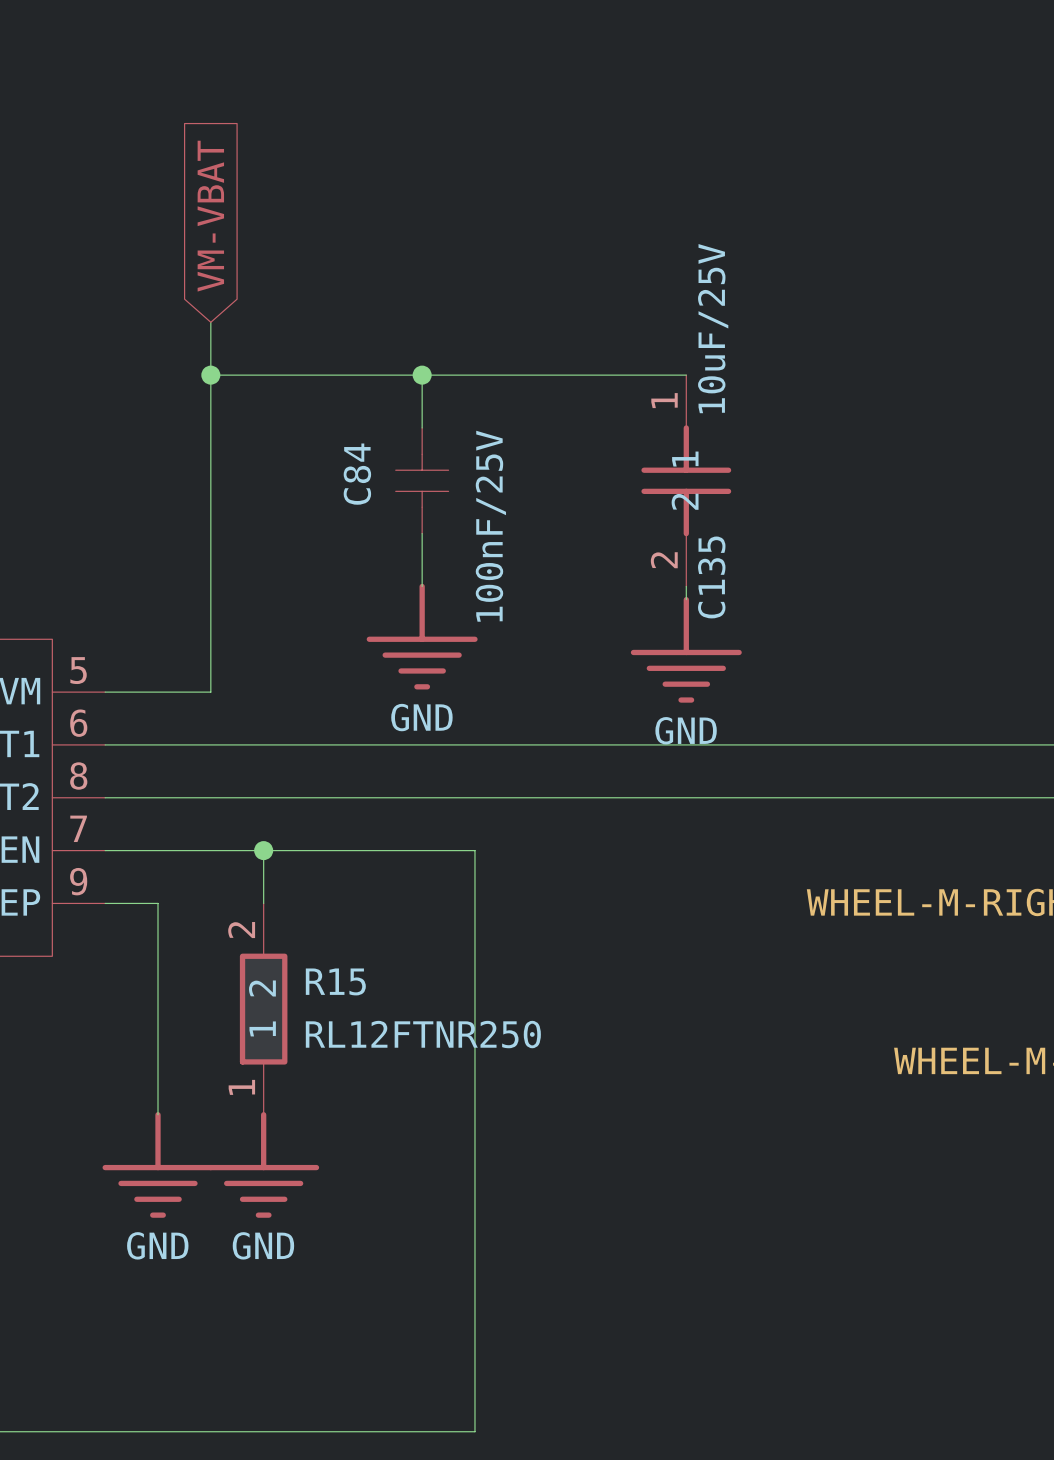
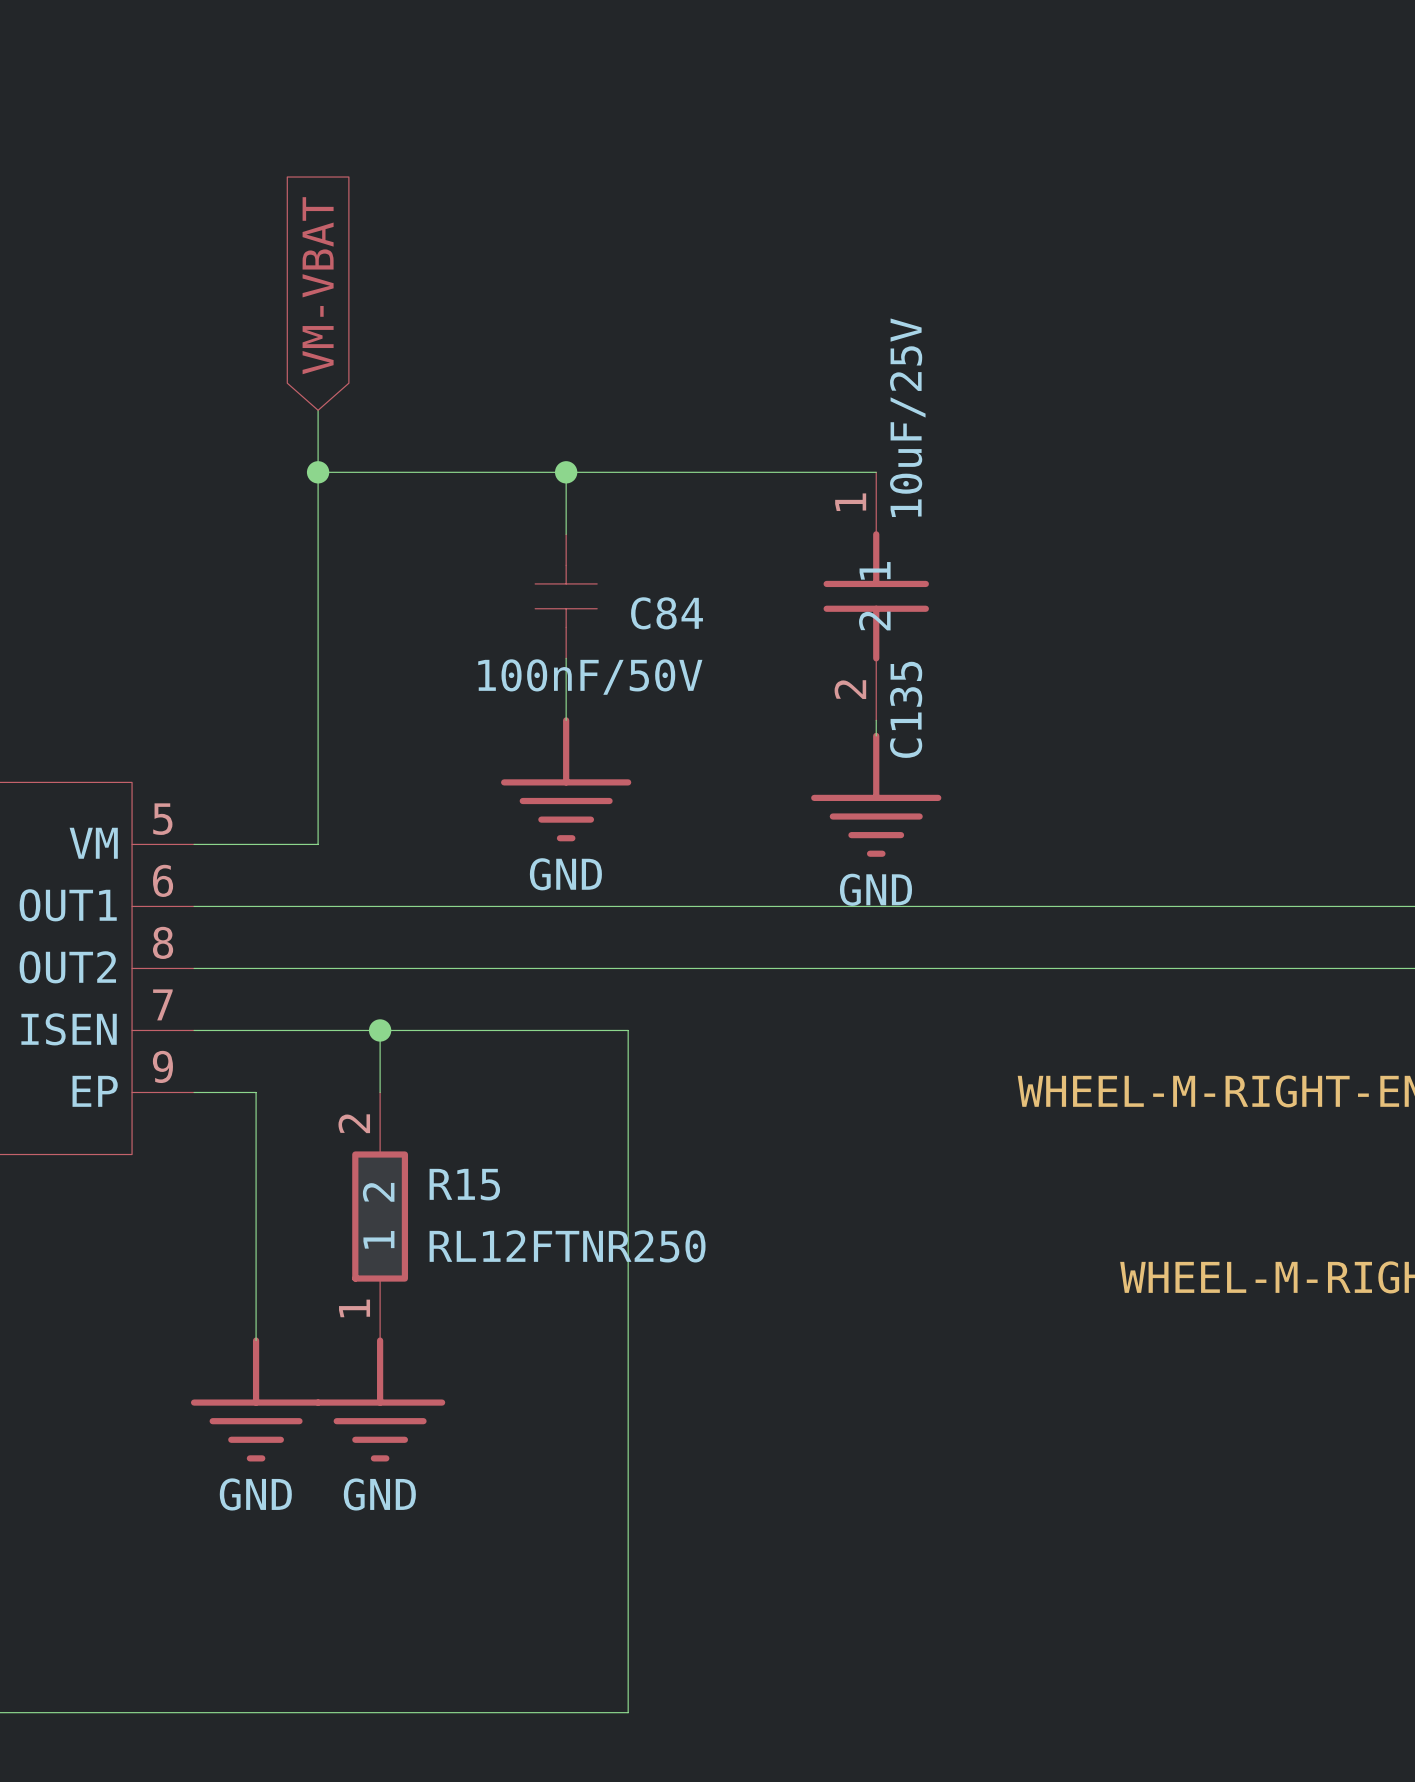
C84 name rotation: 0° (357, 474) -> 90° clockwise (667, 613)
C84 name position: C84 (357, 474) -> C84 (667, 613)
C84 value: 100nF/25V (490, 526) -> 100nF/50V (590, 677)

